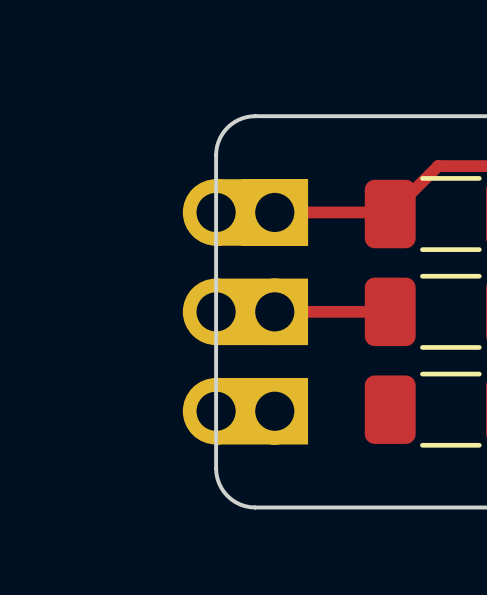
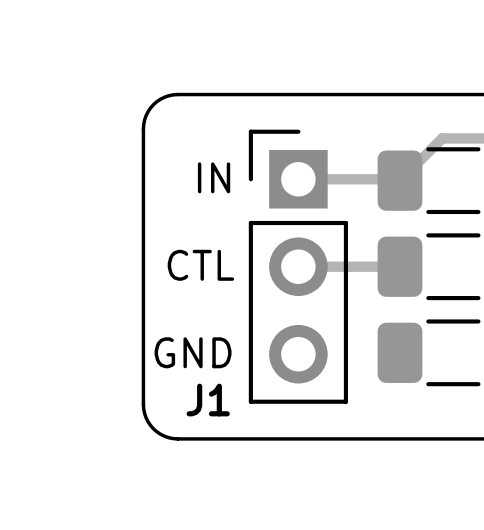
board edge: (255, 116) (238, 120) (227, 127) (218, 142) (216, 155) (216, 473) (219, 483) (227, 496) (240, 504) (255, 507) -> (281, 94) (168, 95) (160, 99) (150, 108) (146, 115) (143, 128) (143, 404) (146, 417) (156, 431) (173, 438) (281, 438)
text: none -> IN (214, 177)
text: none -> CTL (200, 265)
part: (245, 311) -> none
J1: none -> (298, 266)
text: none -> GND (193, 352)

